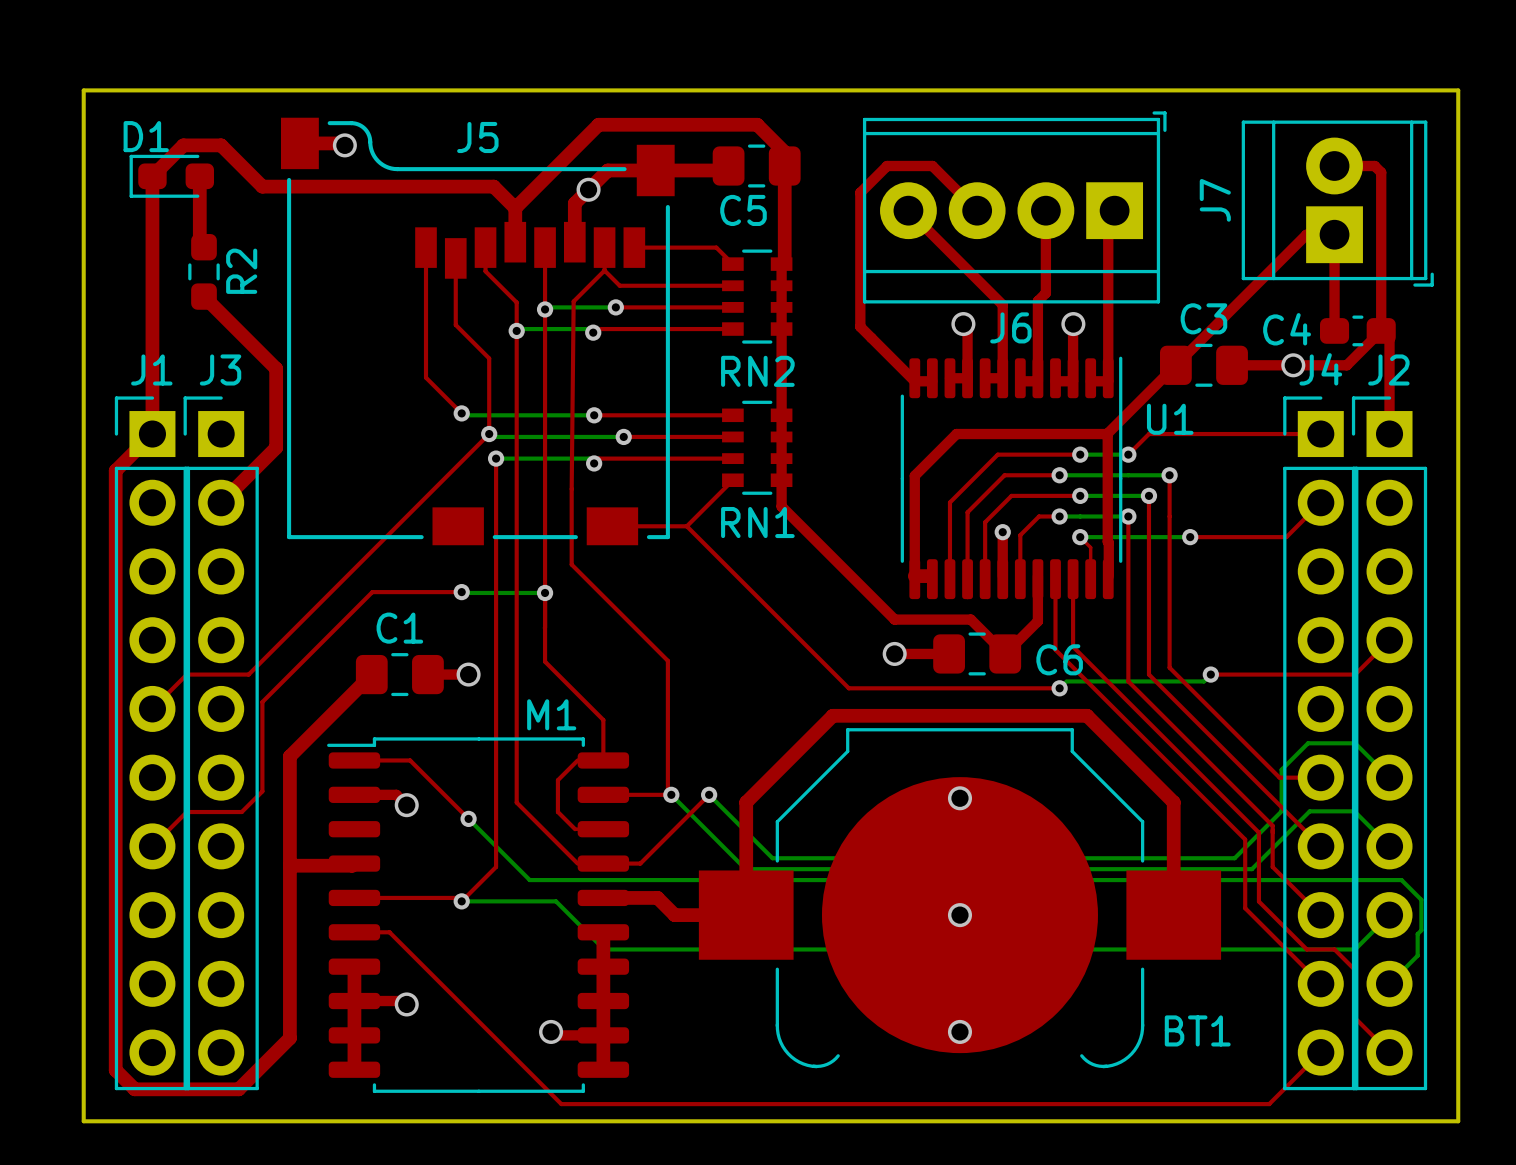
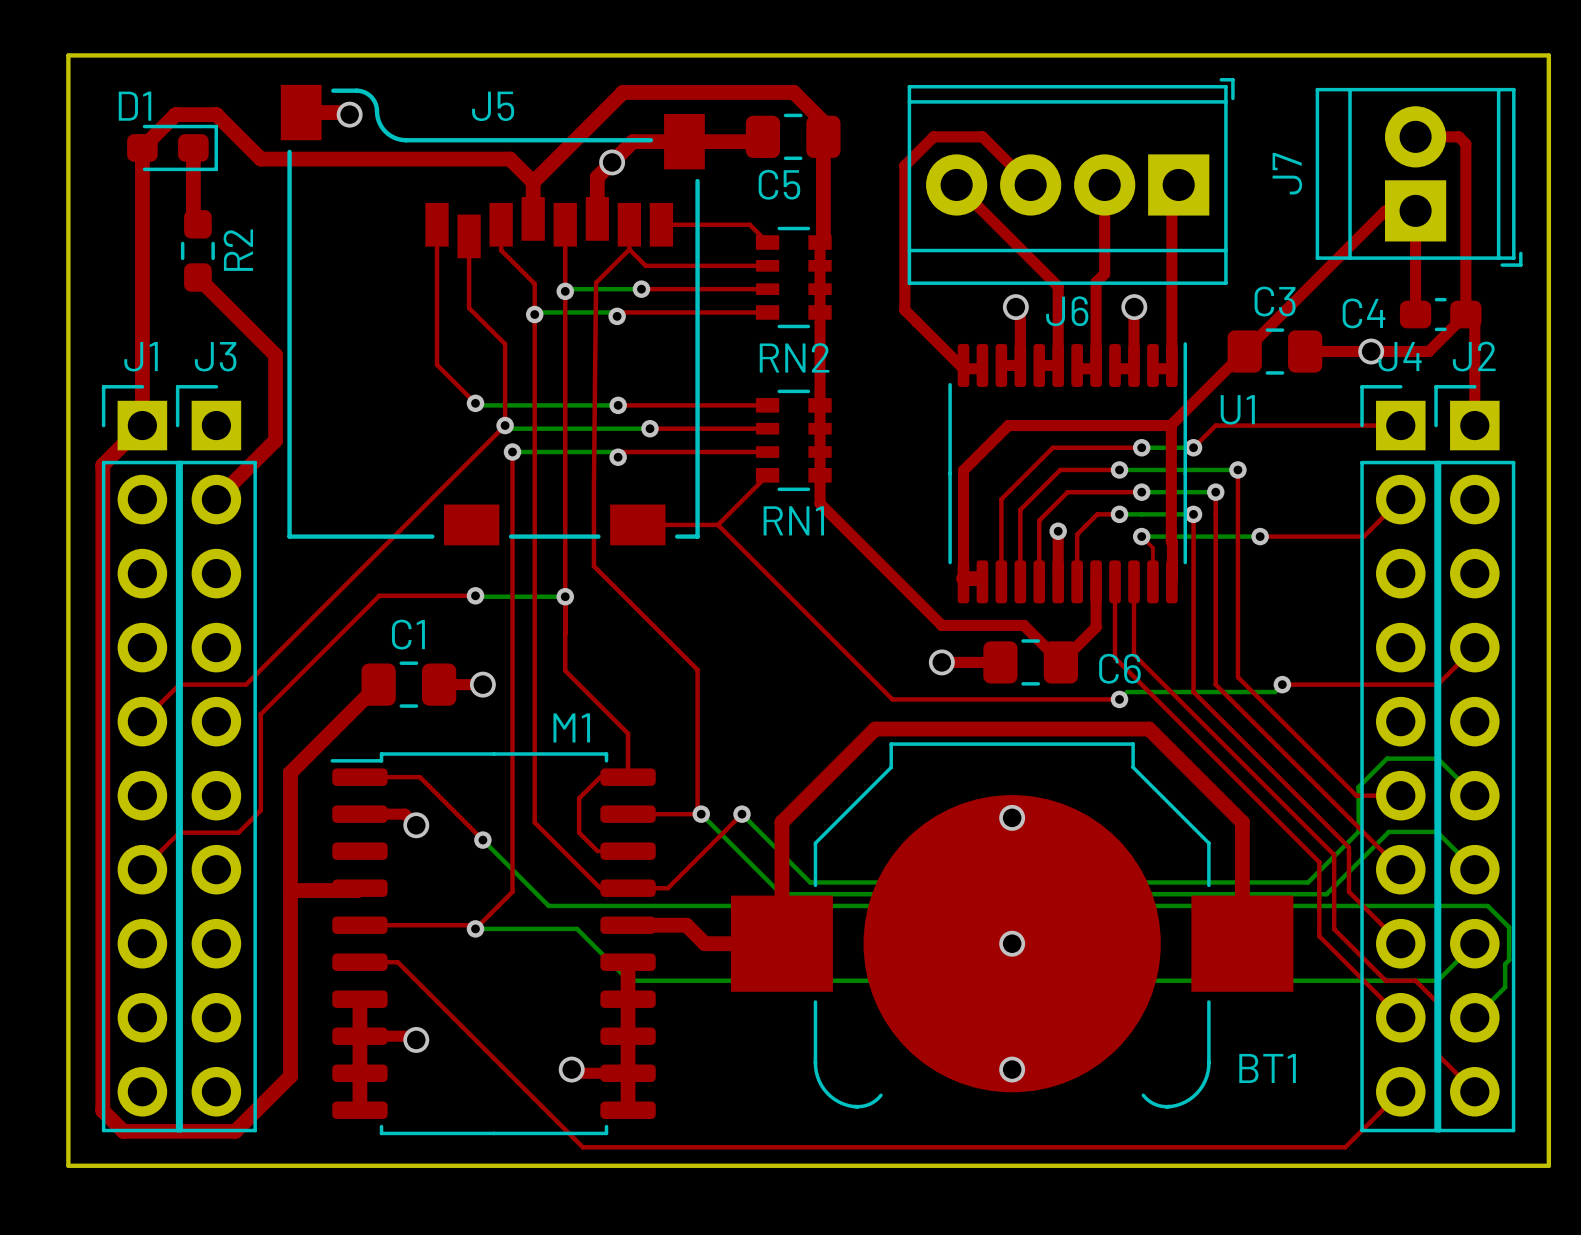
D1 rotation: 0° (171, 176) -> 180° (172, 147)

